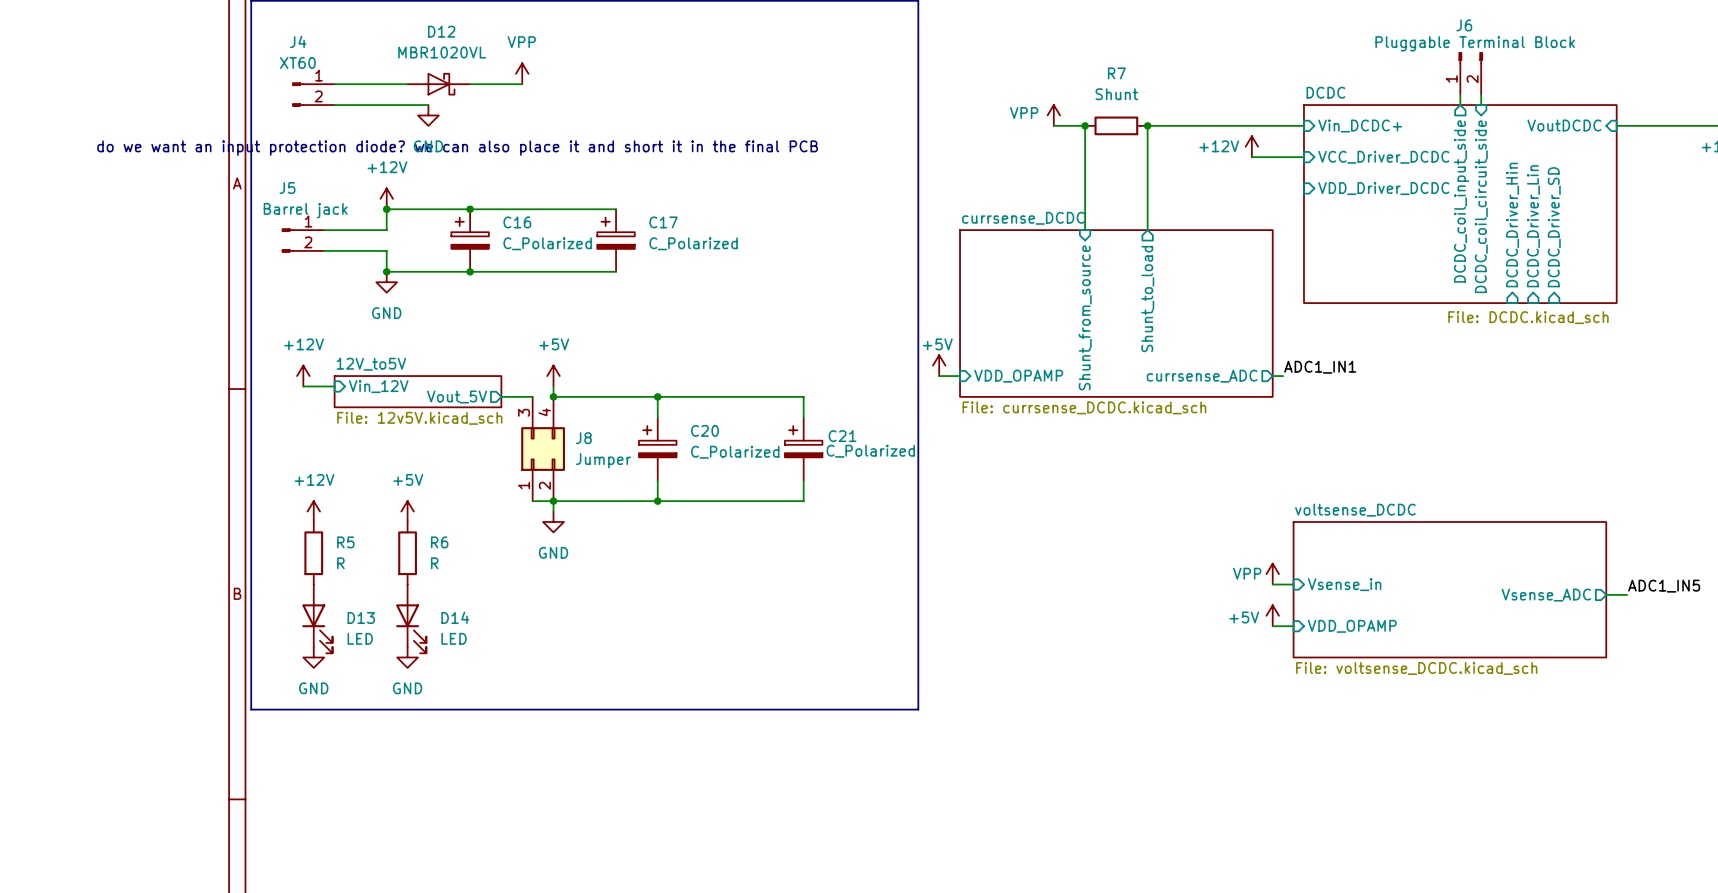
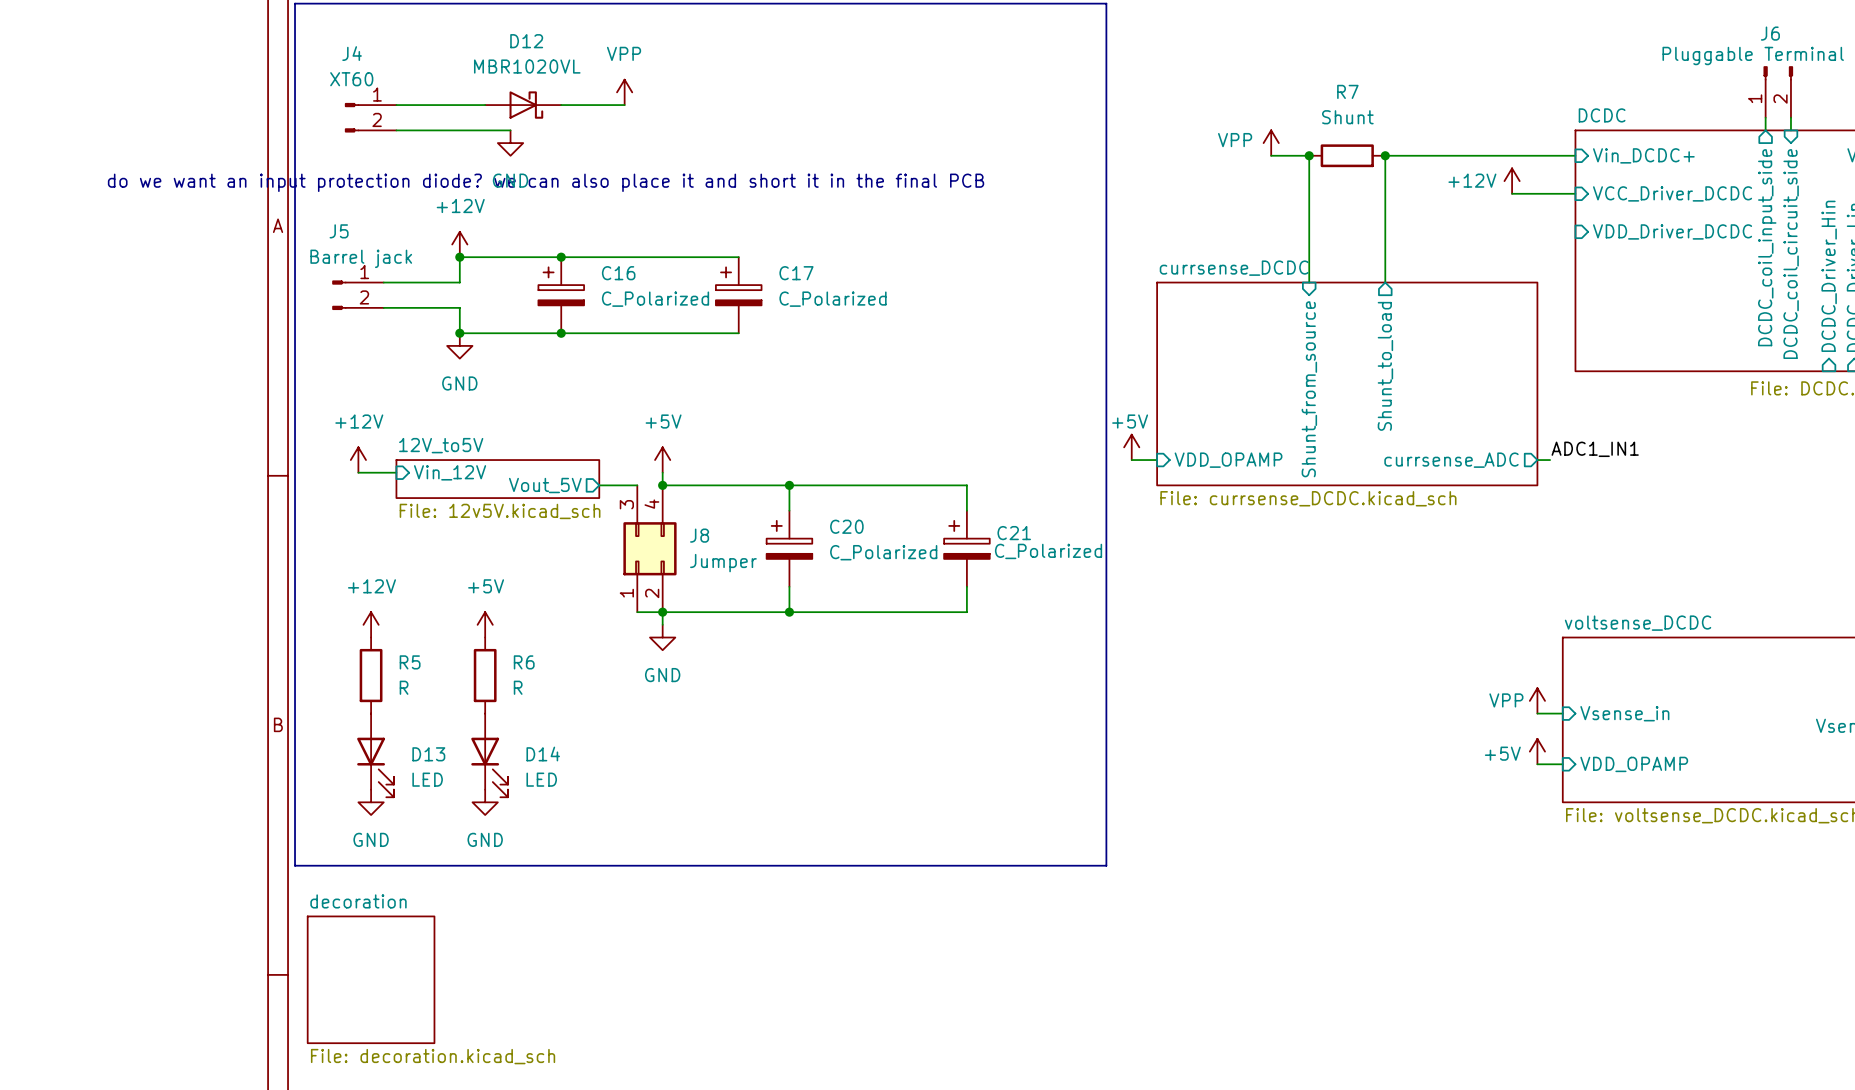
sheet decoration: none -> File: decoration.kicad_sch (371, 979)

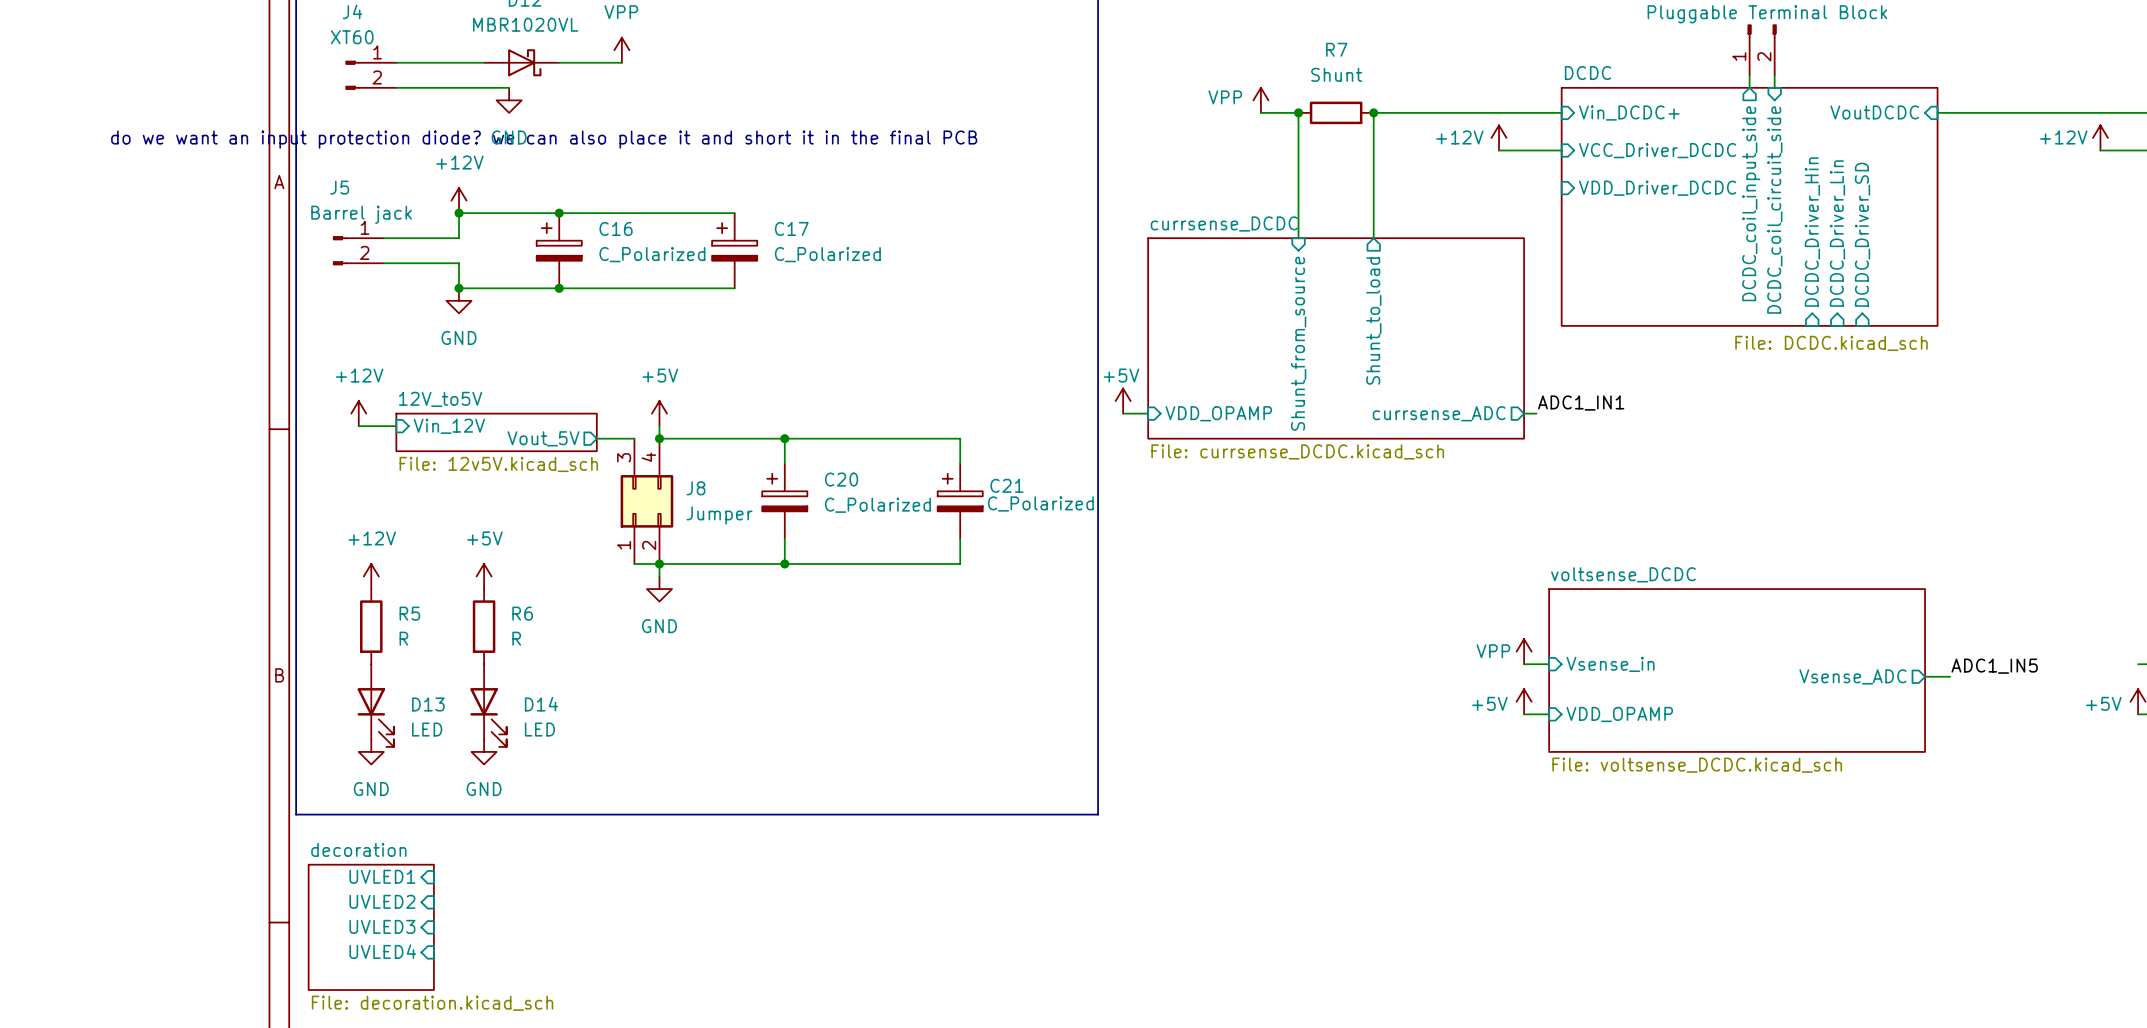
sheet pin: none -> UVLED1 (382, 876)
sheet pin: none -> UVLED2 (382, 901)
sheet pin: none -> UVLED3 (382, 926)
sheet pin: none -> UVLED4 (382, 951)

